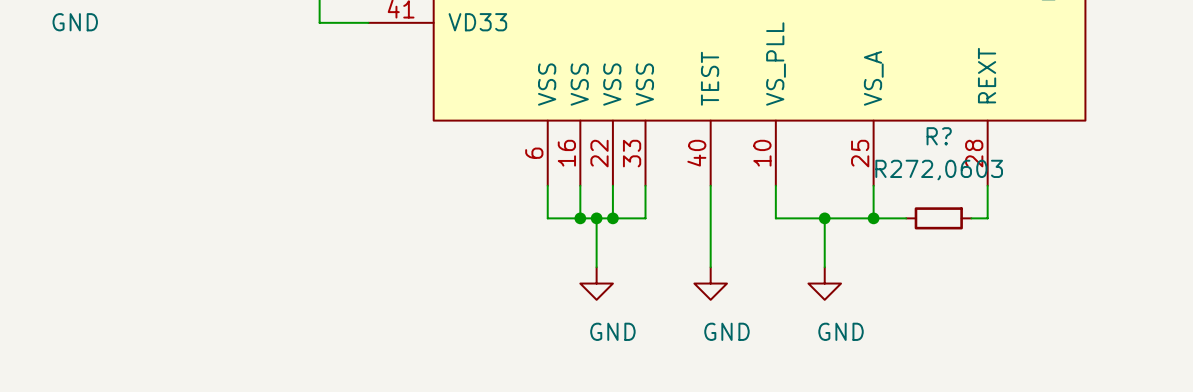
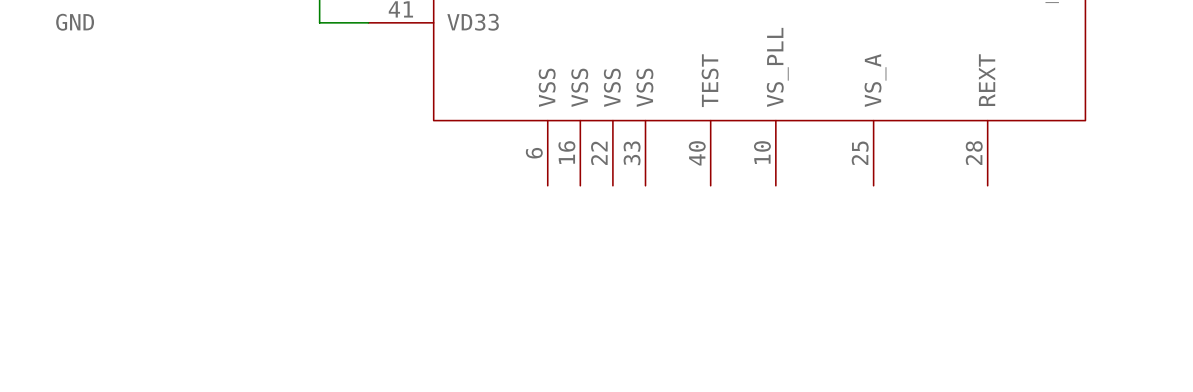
wire: (547, 185) (547, 218) (645, 218) (645, 185) -> none
wire: (580, 185) (580, 218) -> none
wire: (612, 185) (612, 218) -> none
wire: (710, 185) (710, 267) -> none
wire: (775, 185) (775, 218) (906, 218) -> none
wire: (873, 185) (873, 218) -> none
wire: (987, 185) (987, 218) (971, 218) -> none
junction: (580, 218) -> none
wire: (596, 218) (596, 267) -> none
junction: (596, 218) -> none
junction: (612, 218) -> none
wire: (824, 218) (824, 267) -> none
junction: (824, 218) -> none
junction: (873, 218) -> none
R?: R272,0603 (938, 218) -> none
power symbol: GND (596, 283) -> none
power symbol: GND (710, 283) -> none
power symbol: GND (824, 283) -> none

